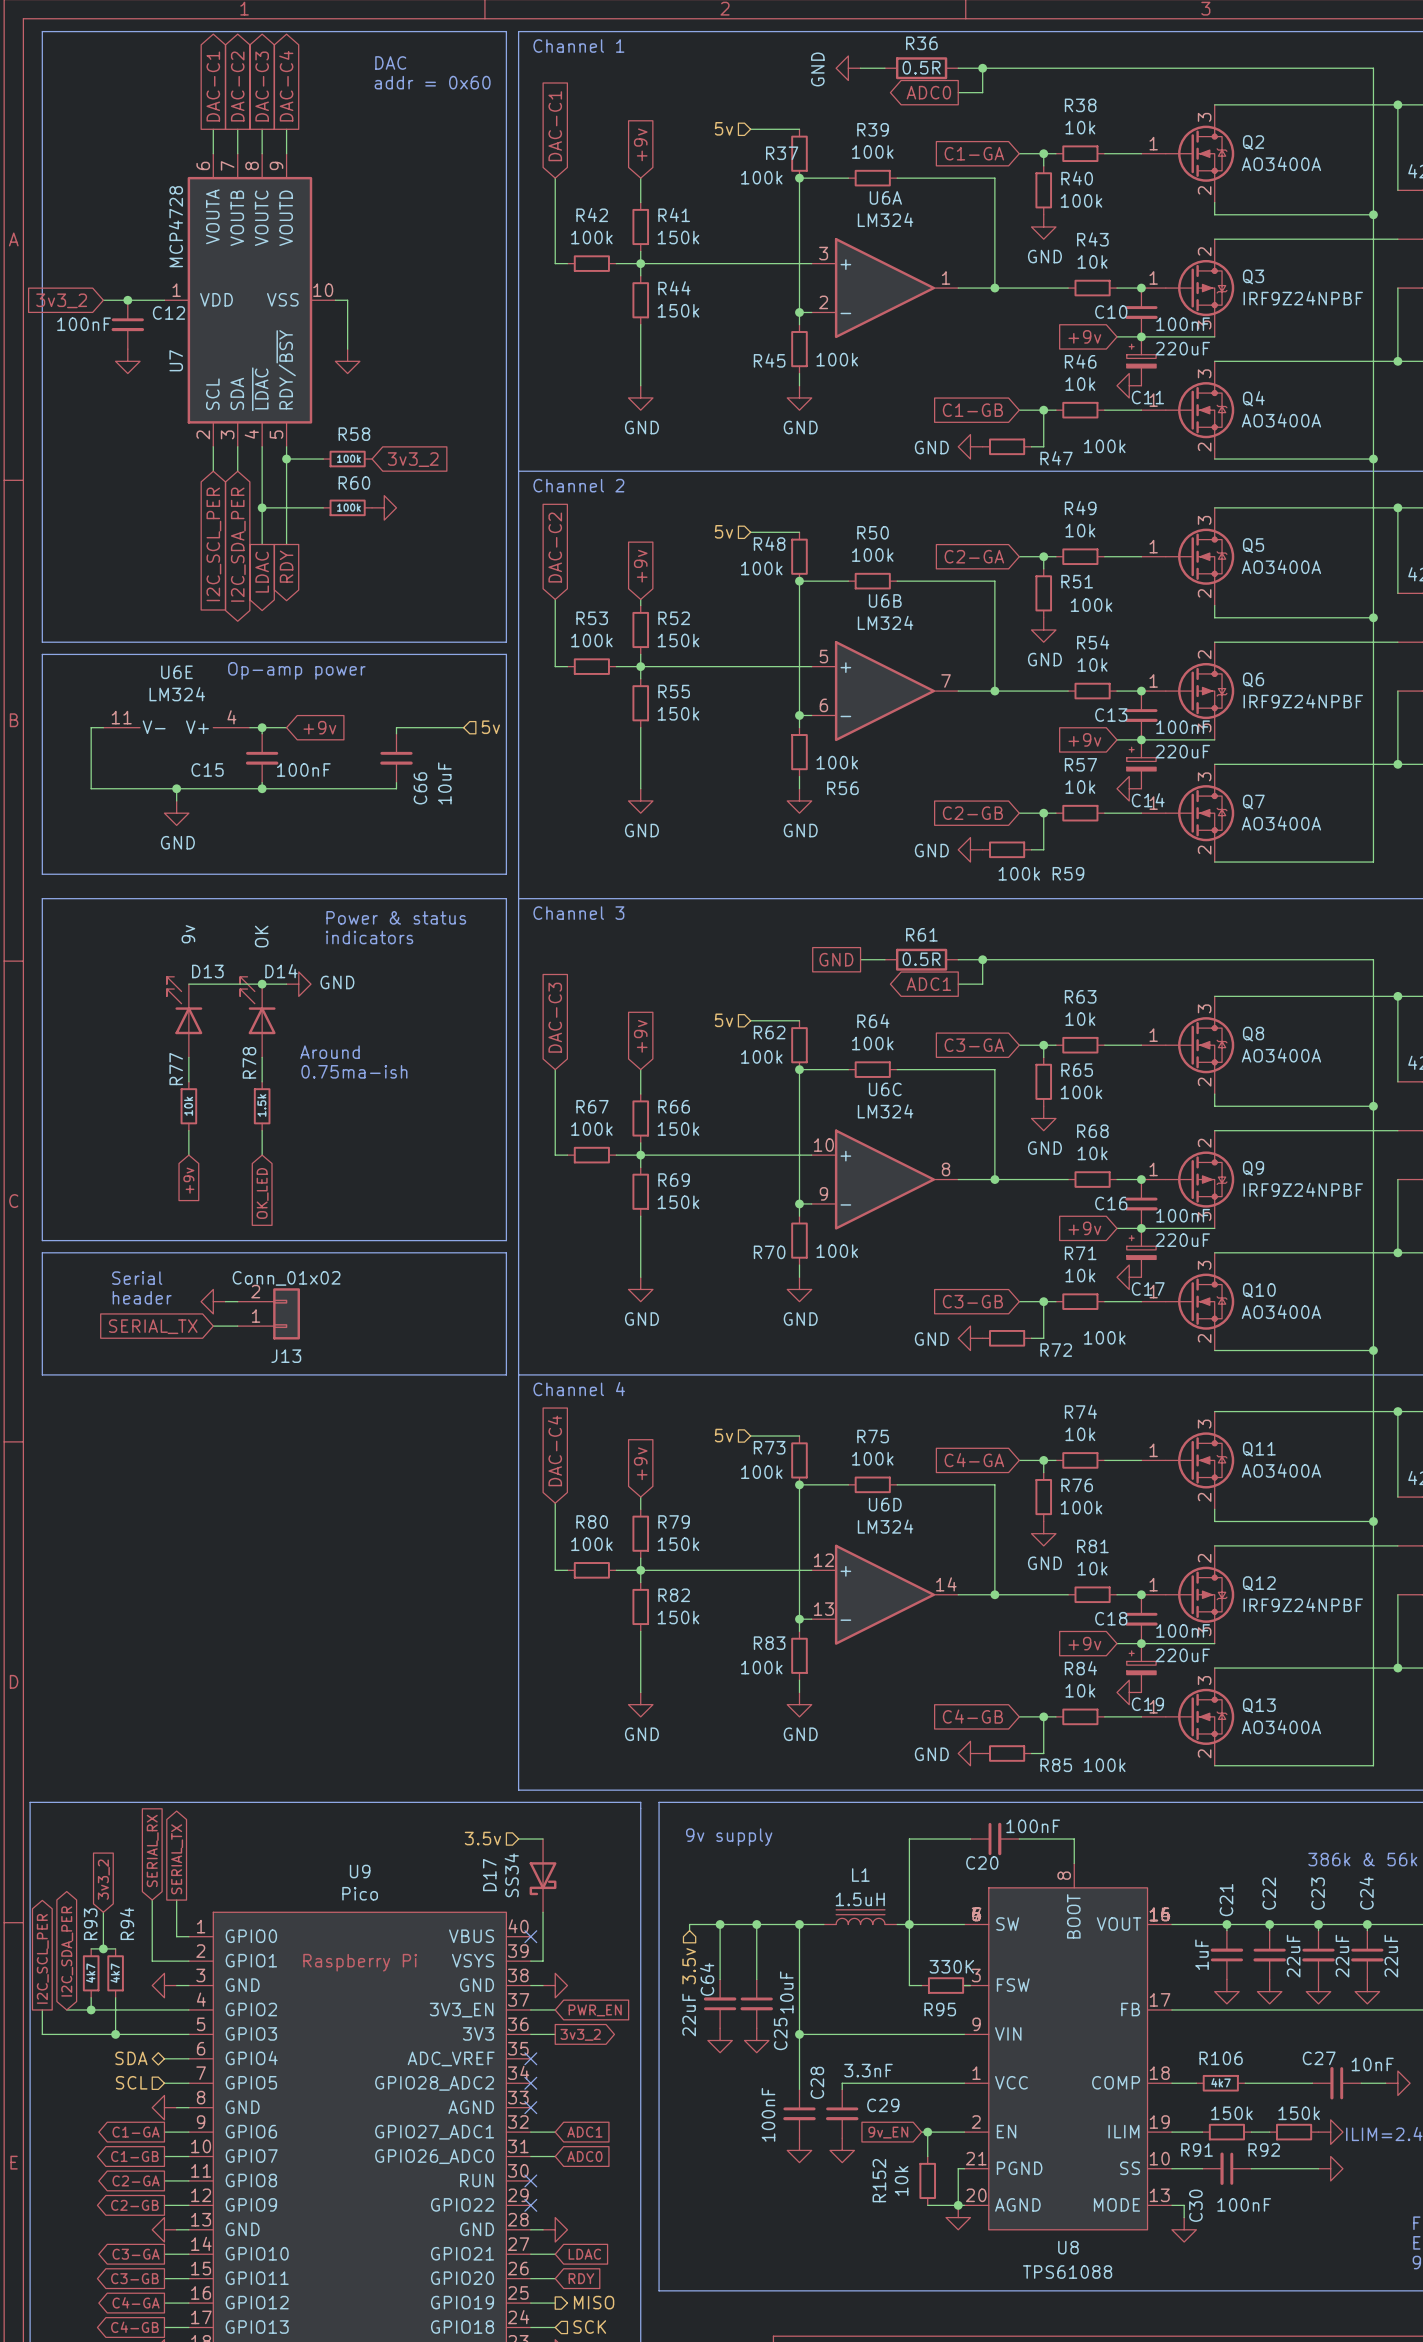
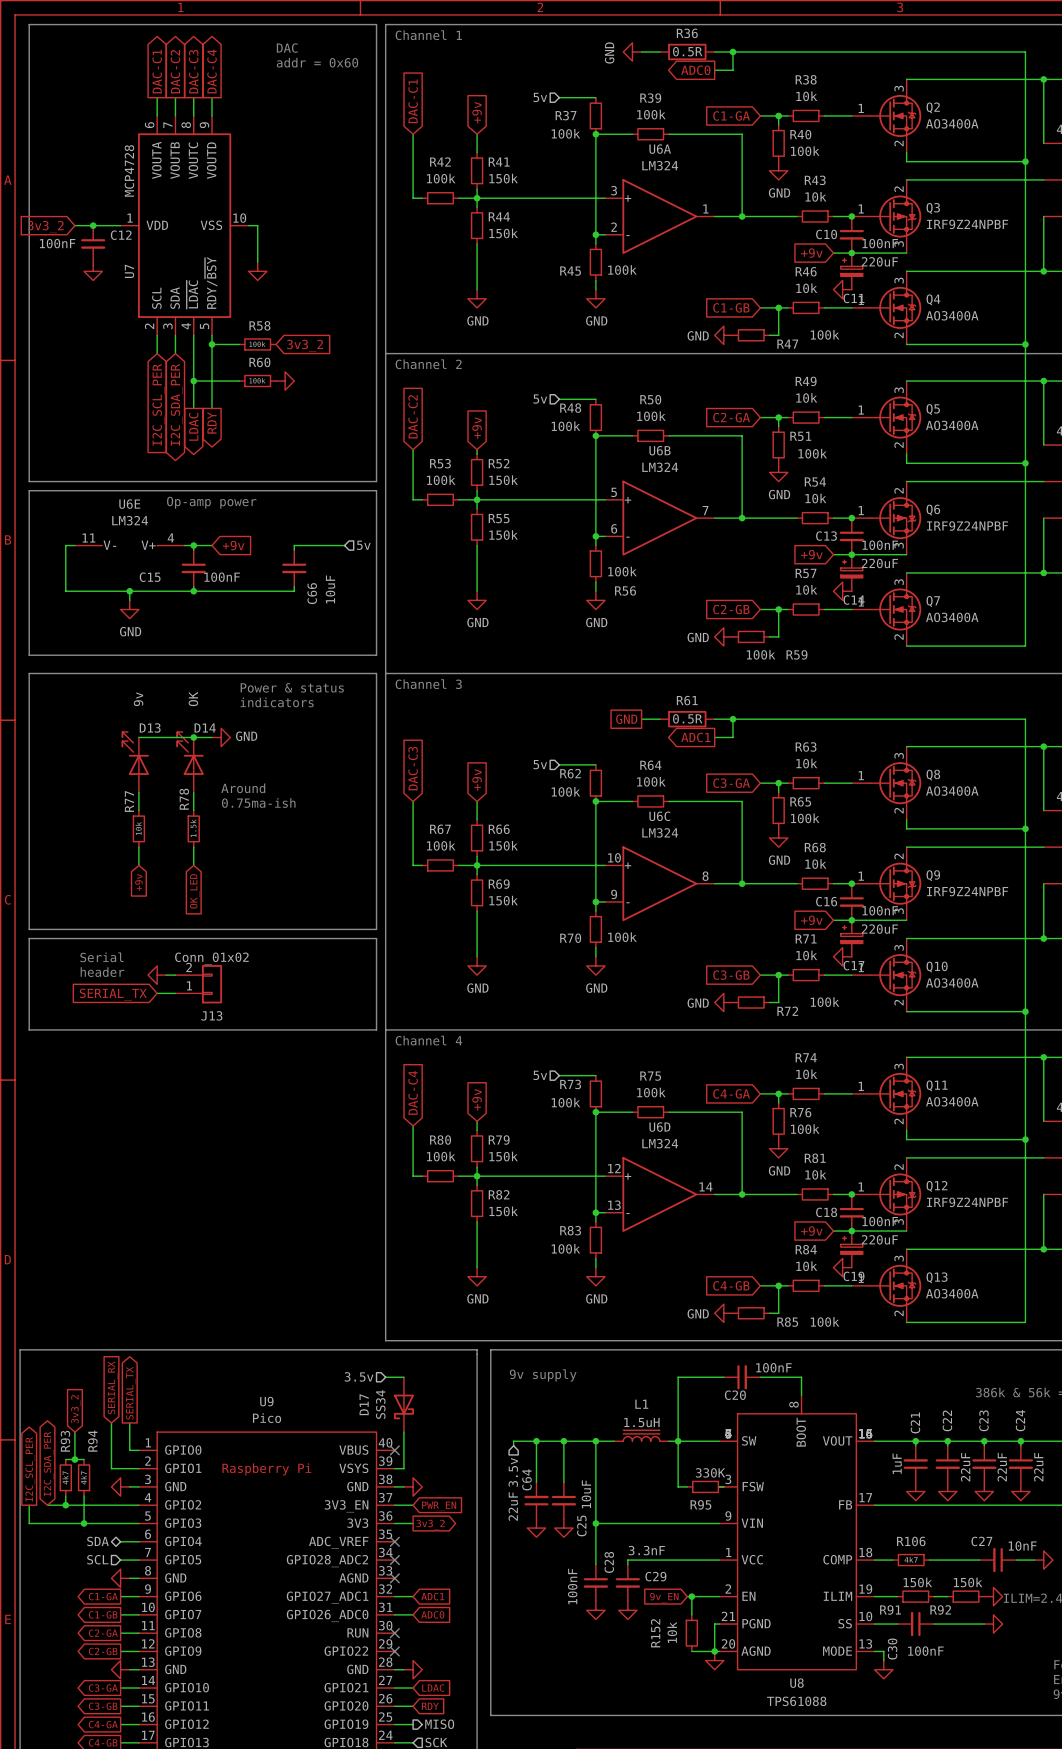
R37 name position: R37 (782, 153) -> R37 (566, 115)

